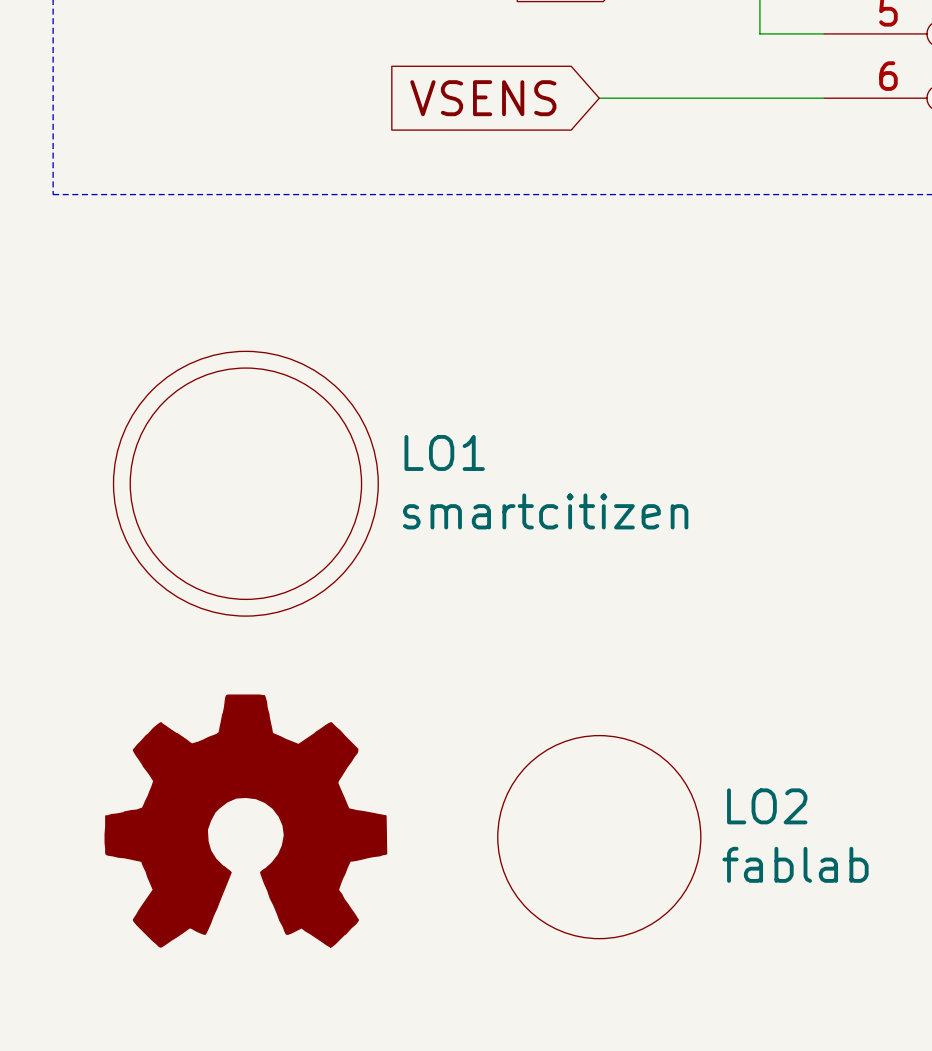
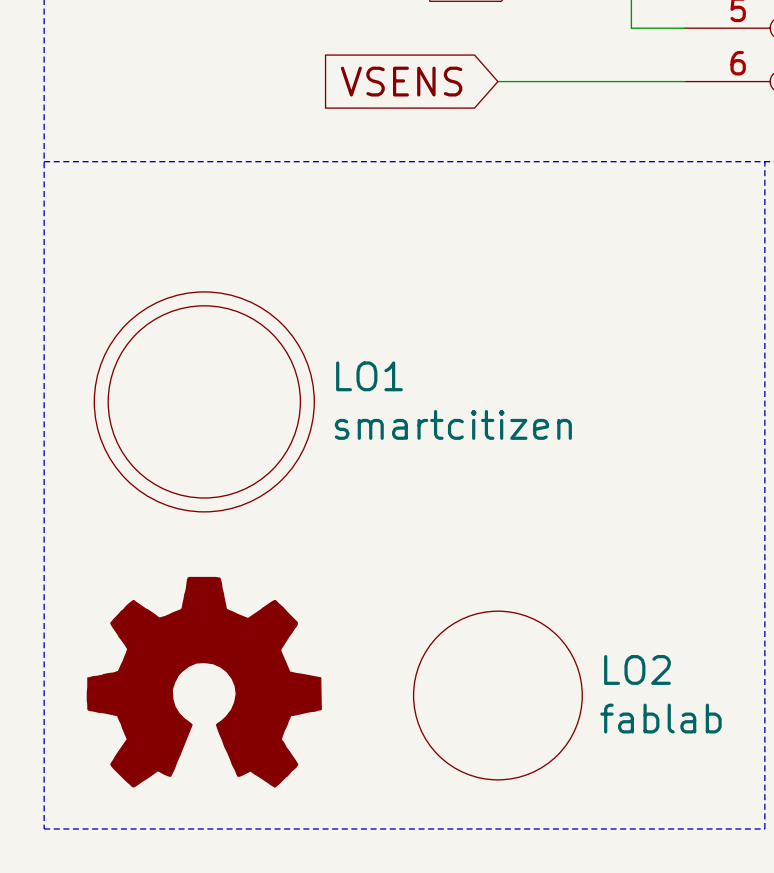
line: none -> (44, 161) (44, 828) (764, 828) (764, 161)

